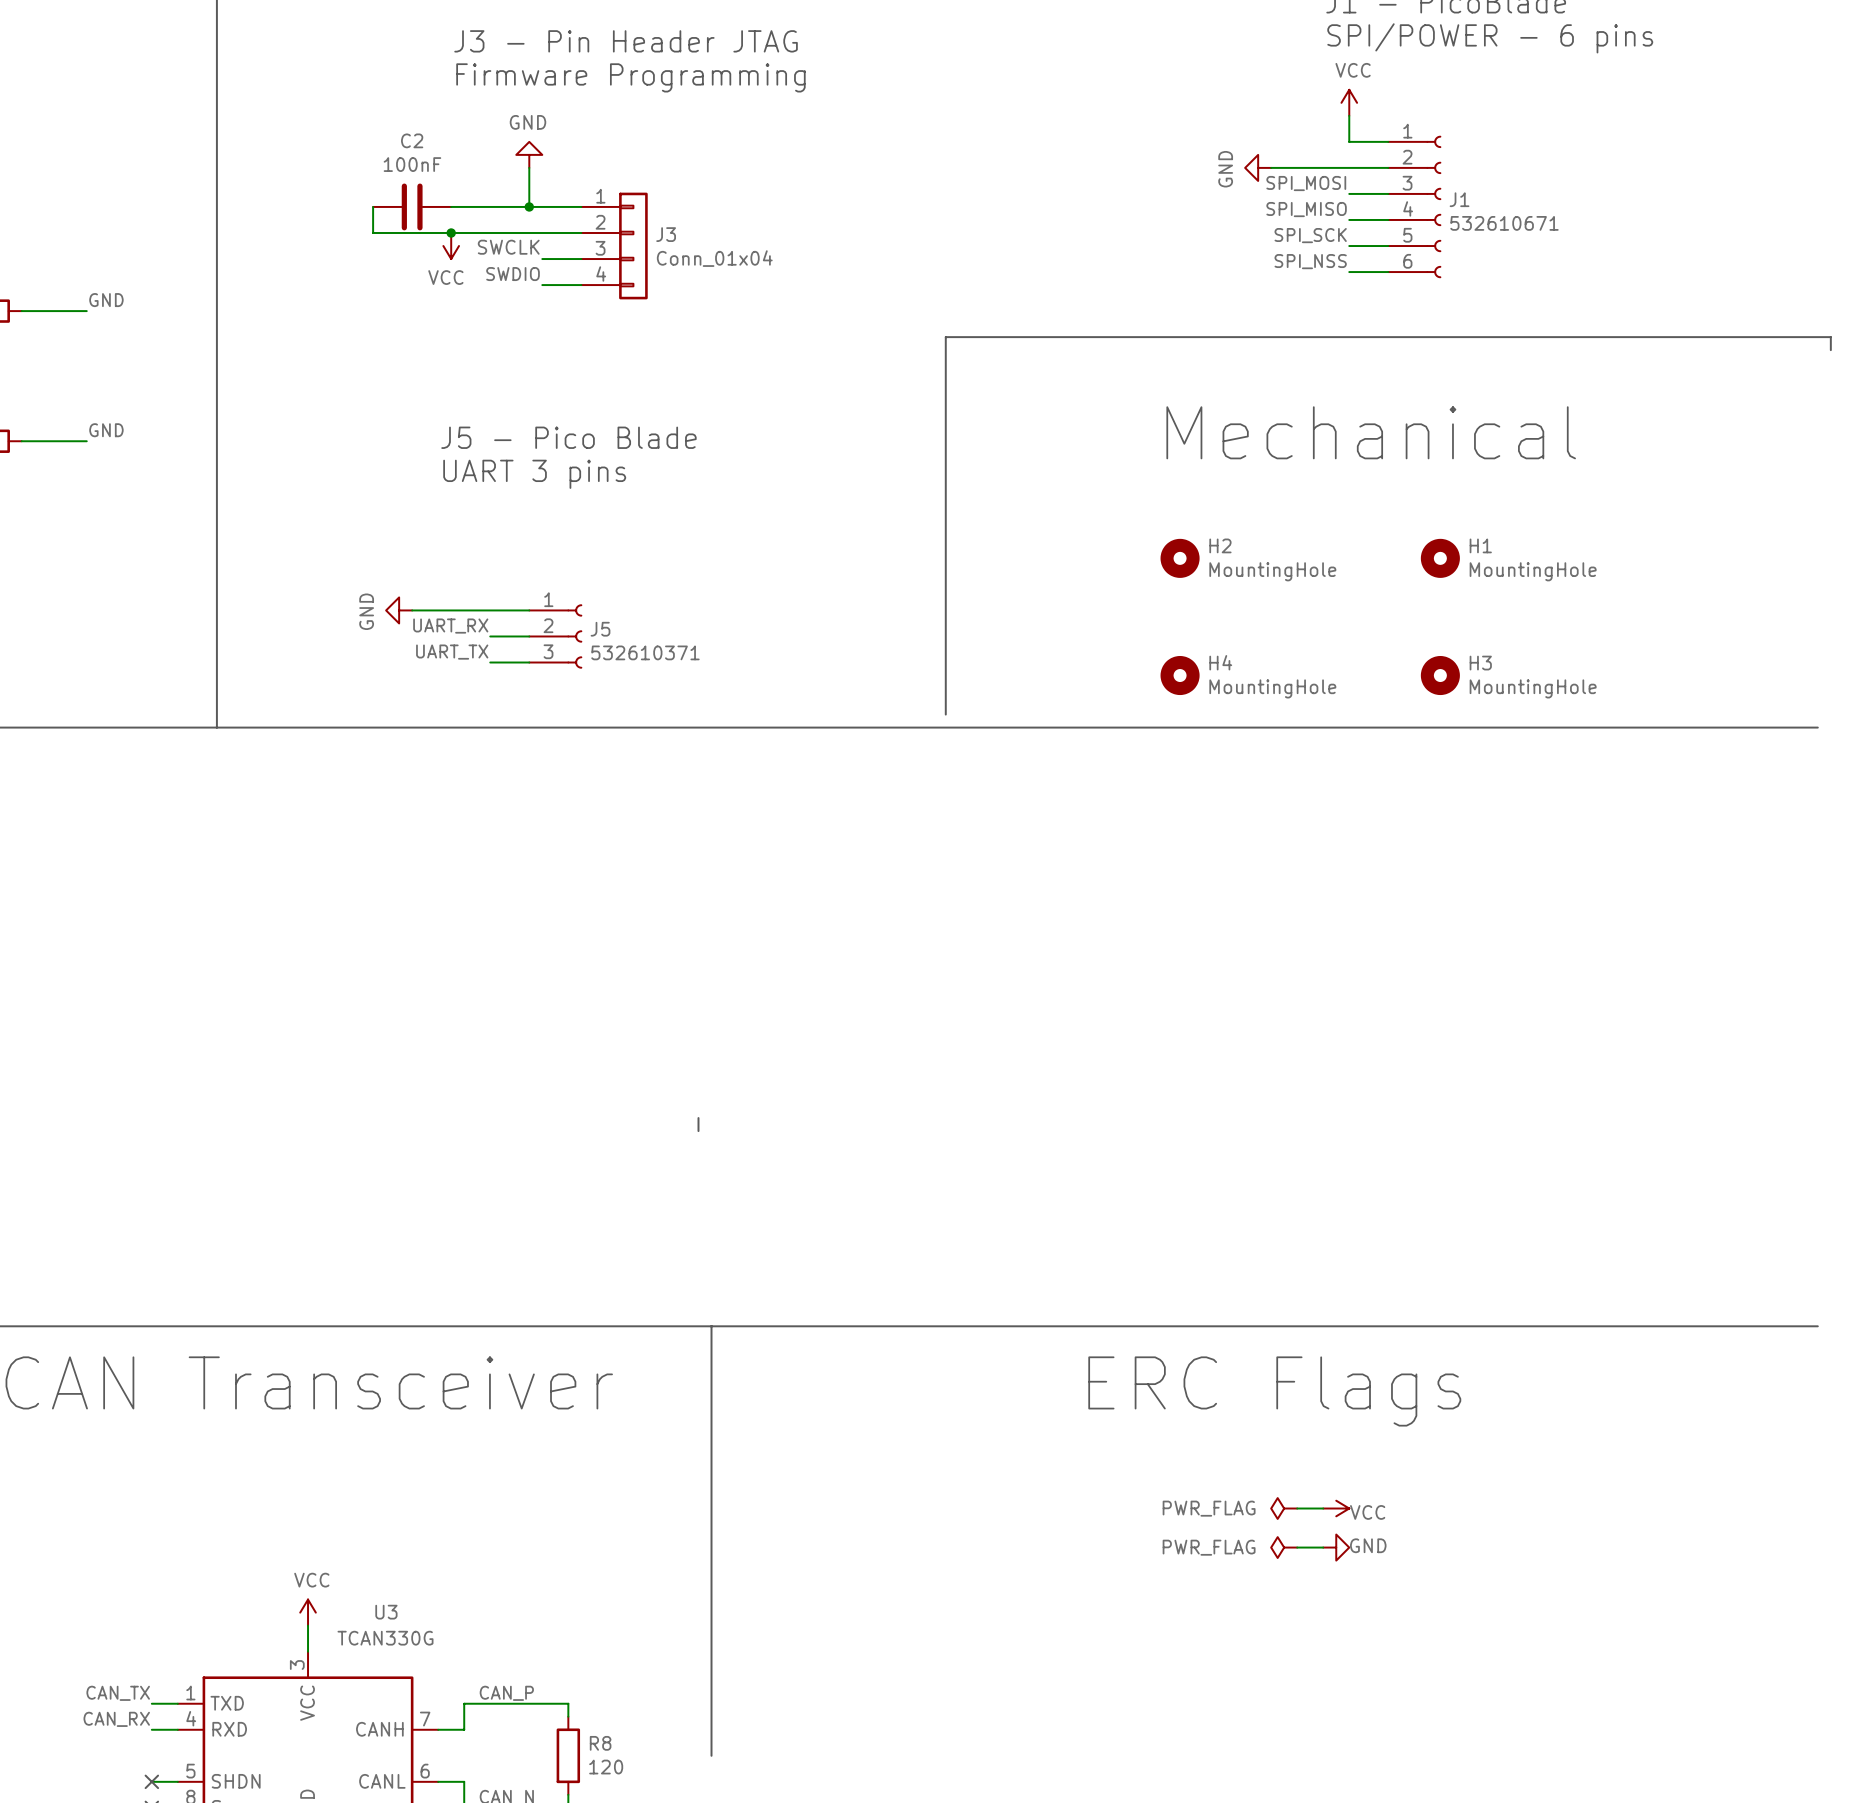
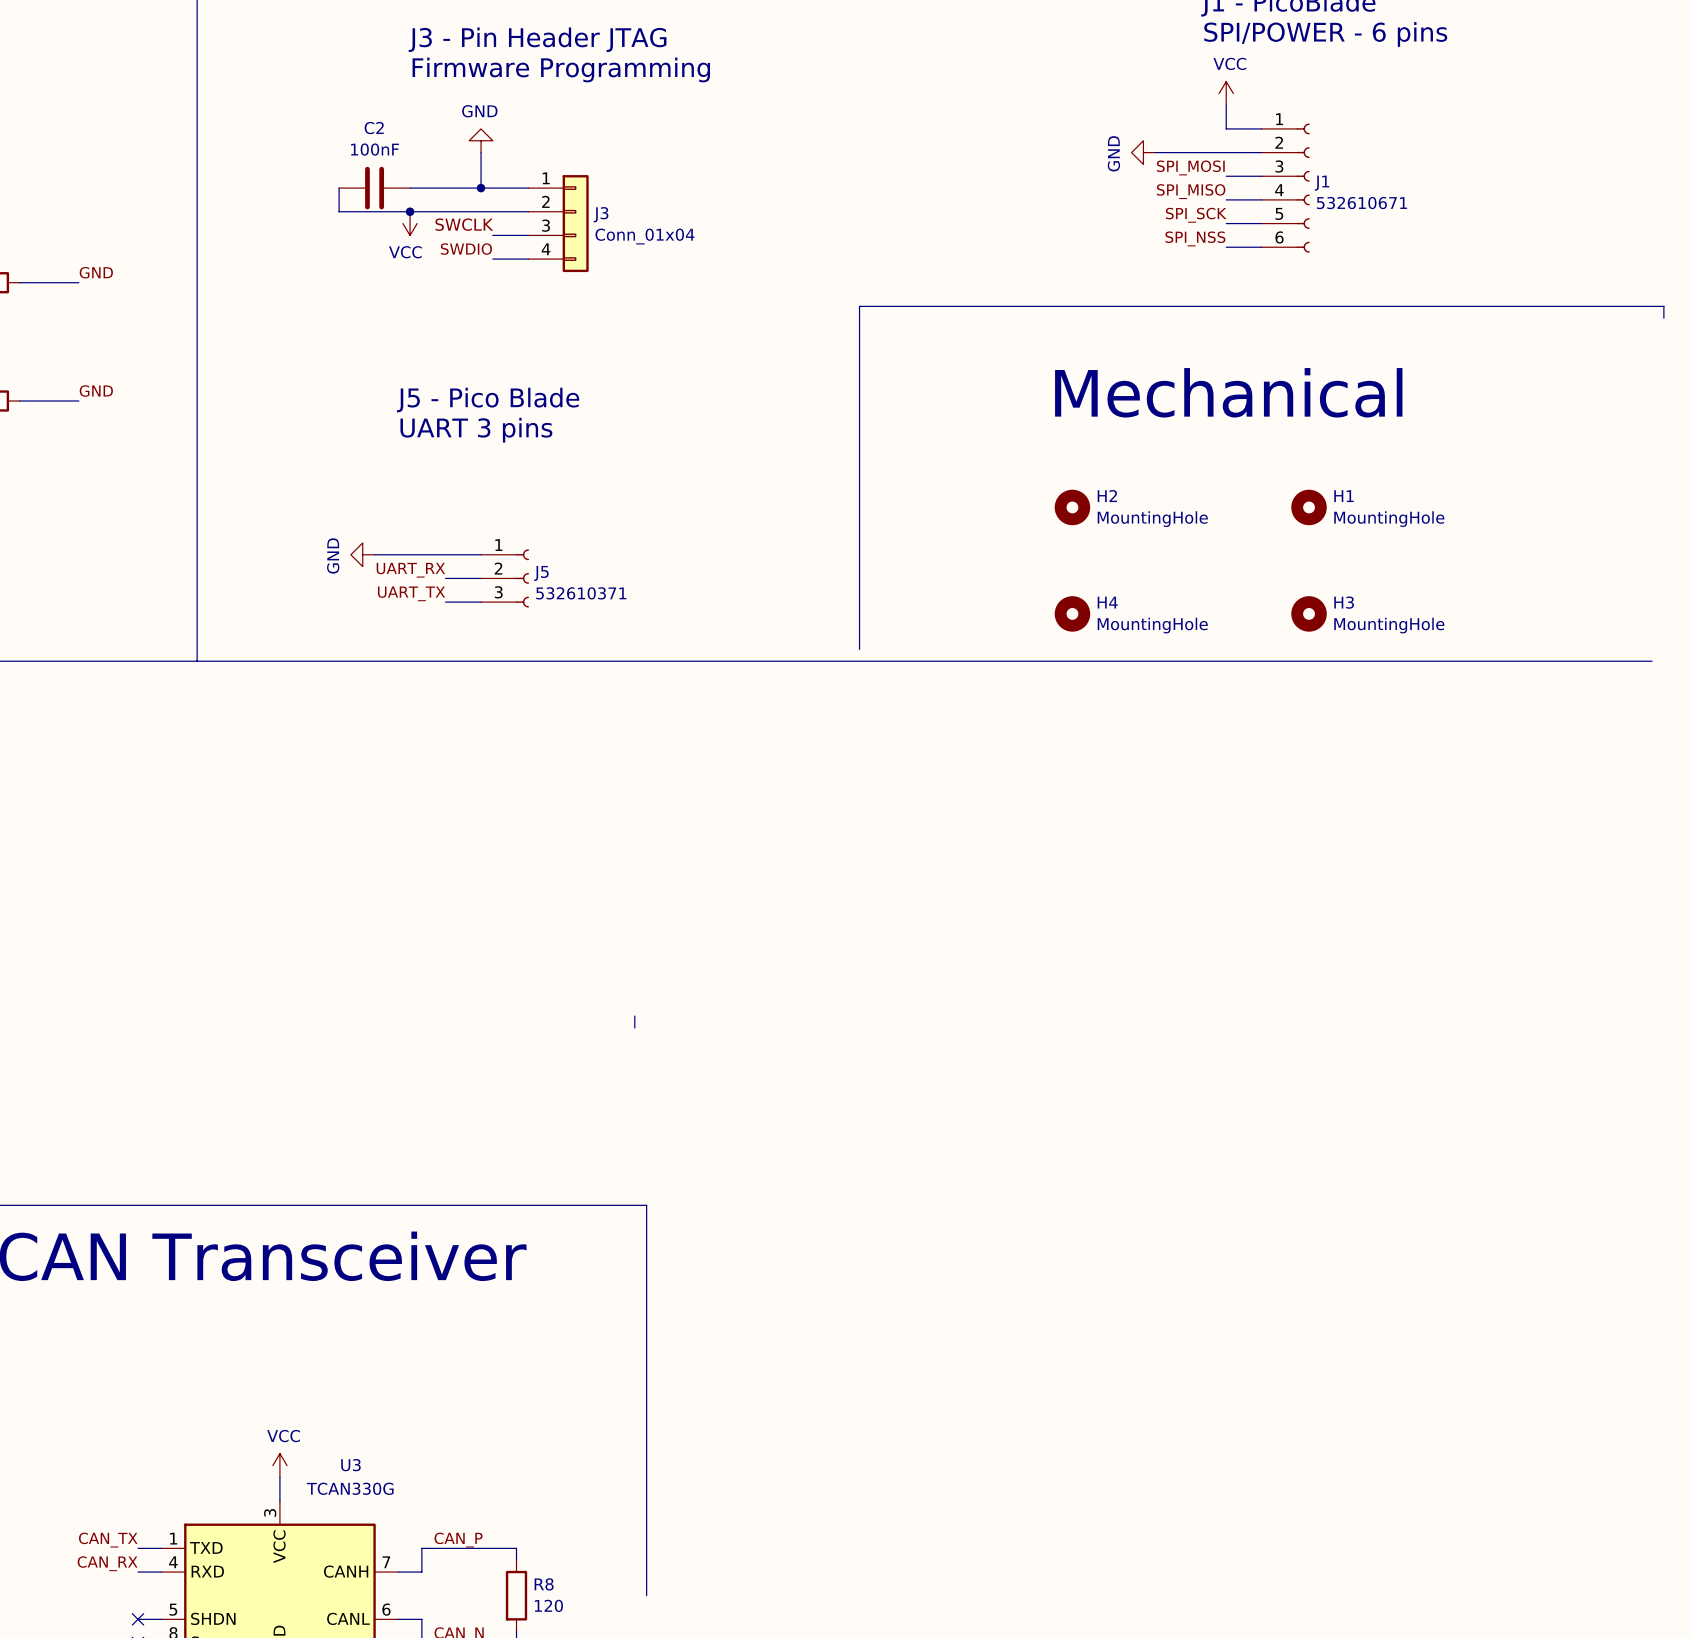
line: (711, 1326) (1817, 1326) -> none
text: ERC Flags (1274, 1391) -> none
power symbol: PWR_FLAG (1284, 1508) -> none
wire: (1297, 1508) (1323, 1508) -> none
power symbol: VCC (1336, 1508) -> none
power symbol: PWR_FLAG (1284, 1547) -> none
wire: (1297, 1547) (1323, 1547) -> none
power symbol: GND (1336, 1547) -> none

